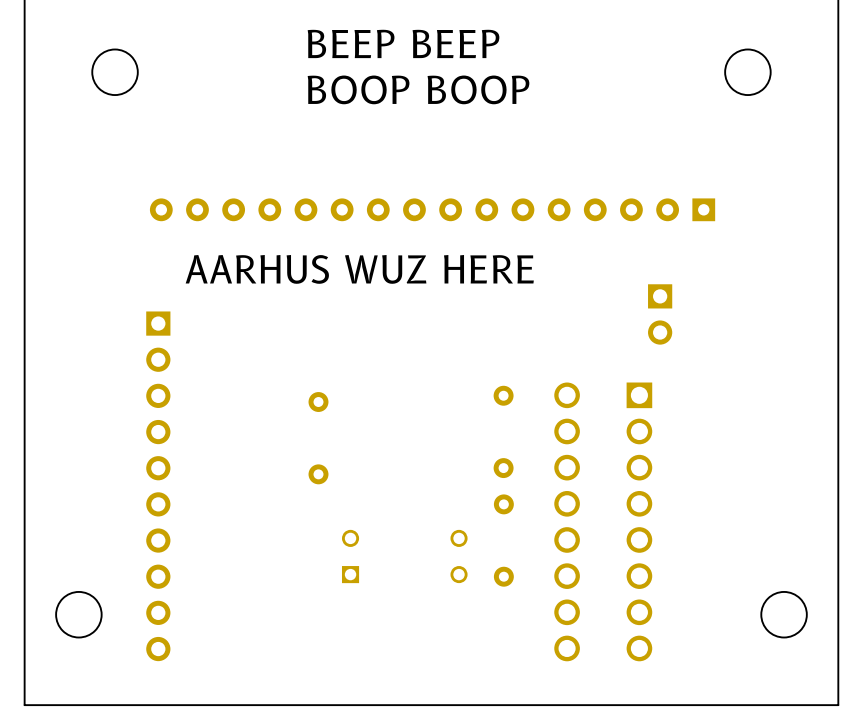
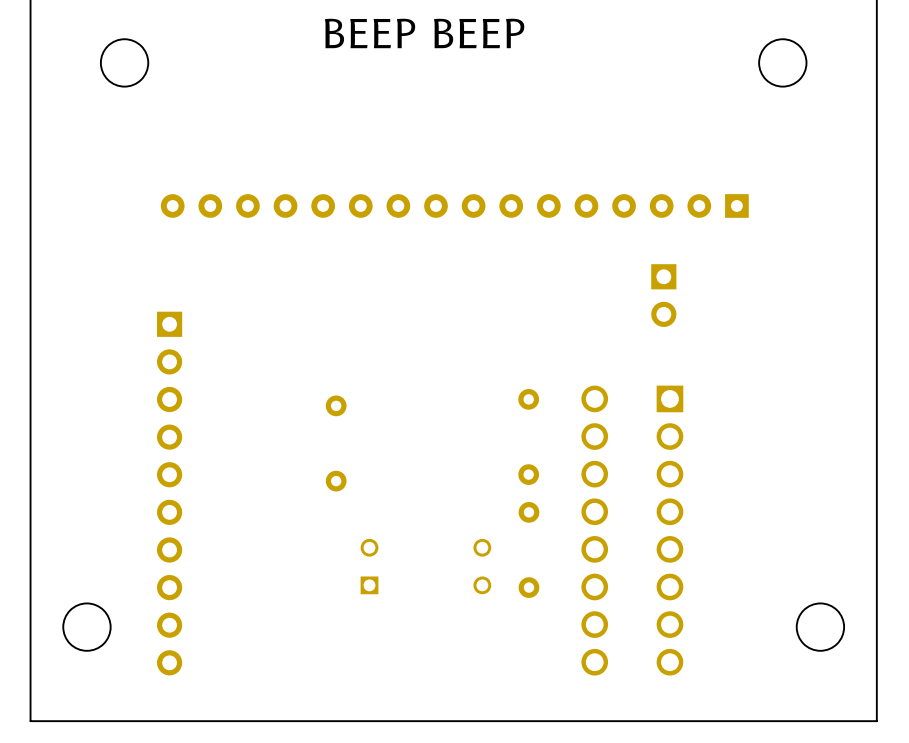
text: BOOP BOOP (418, 89) -> none
text: AARHUS WUZ HERE (359, 269) -> none
part position: (660, 314) -> (663, 295)

